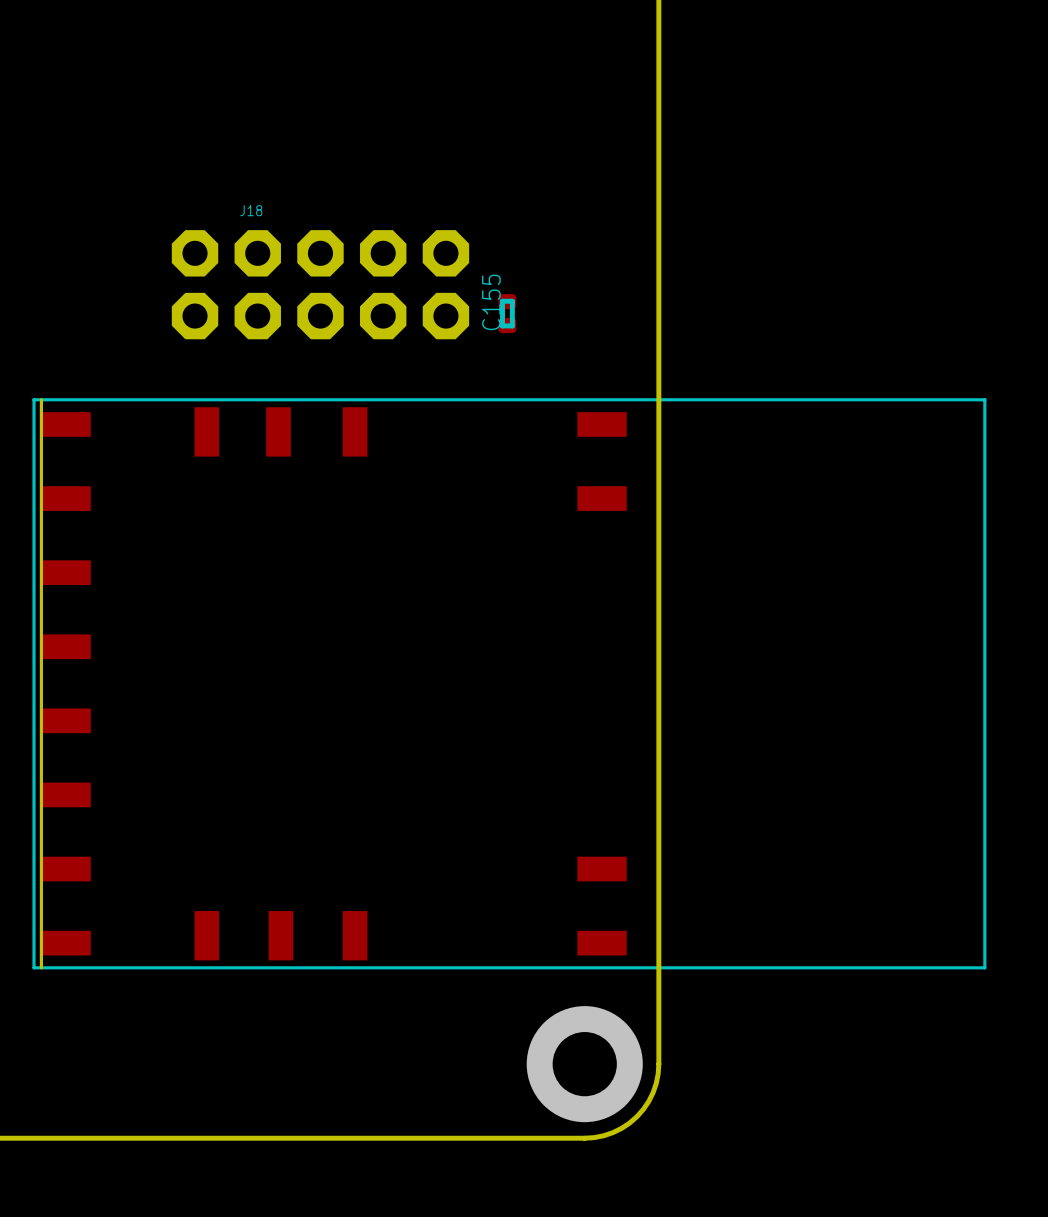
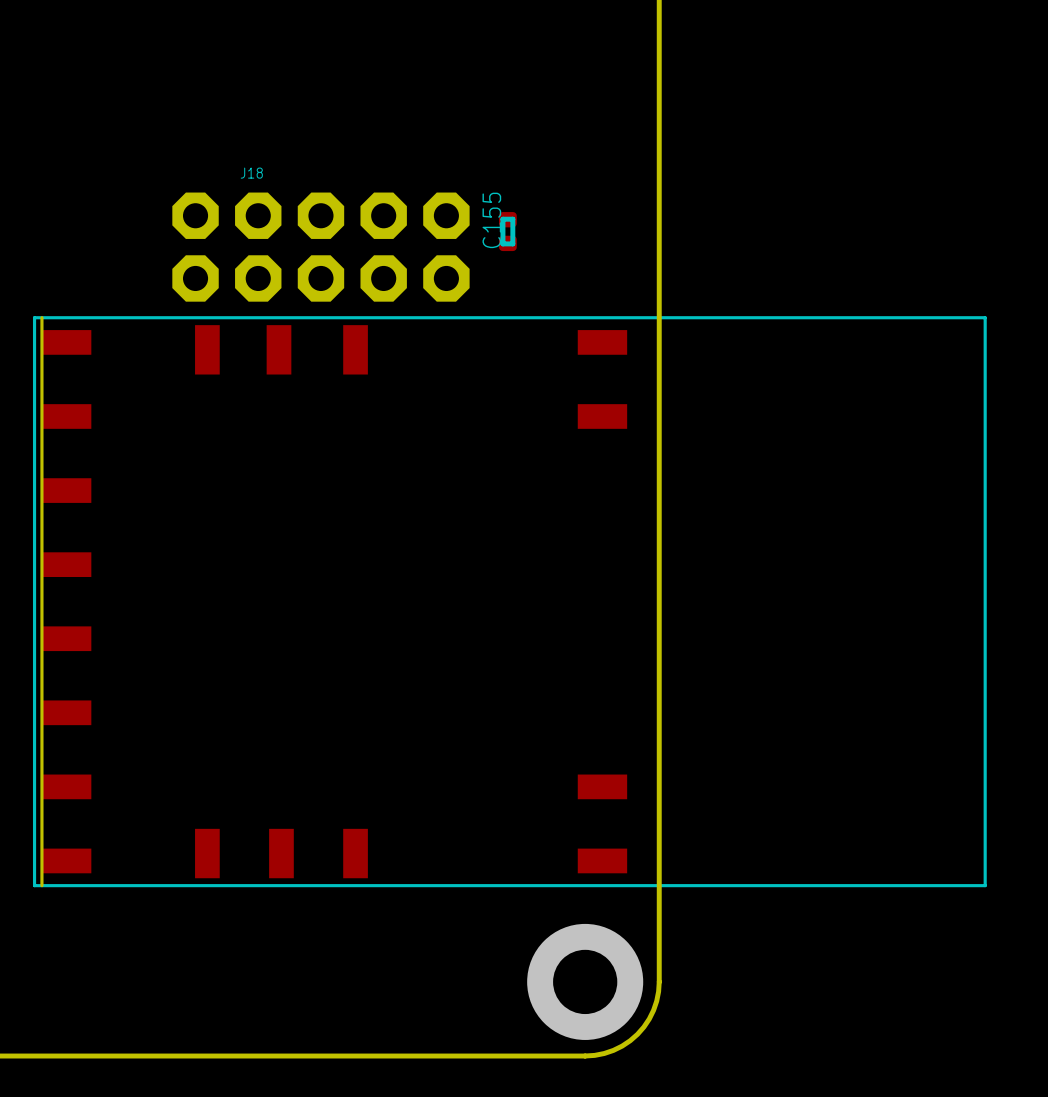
J18 position: (320, 284) -> (320, 247)

